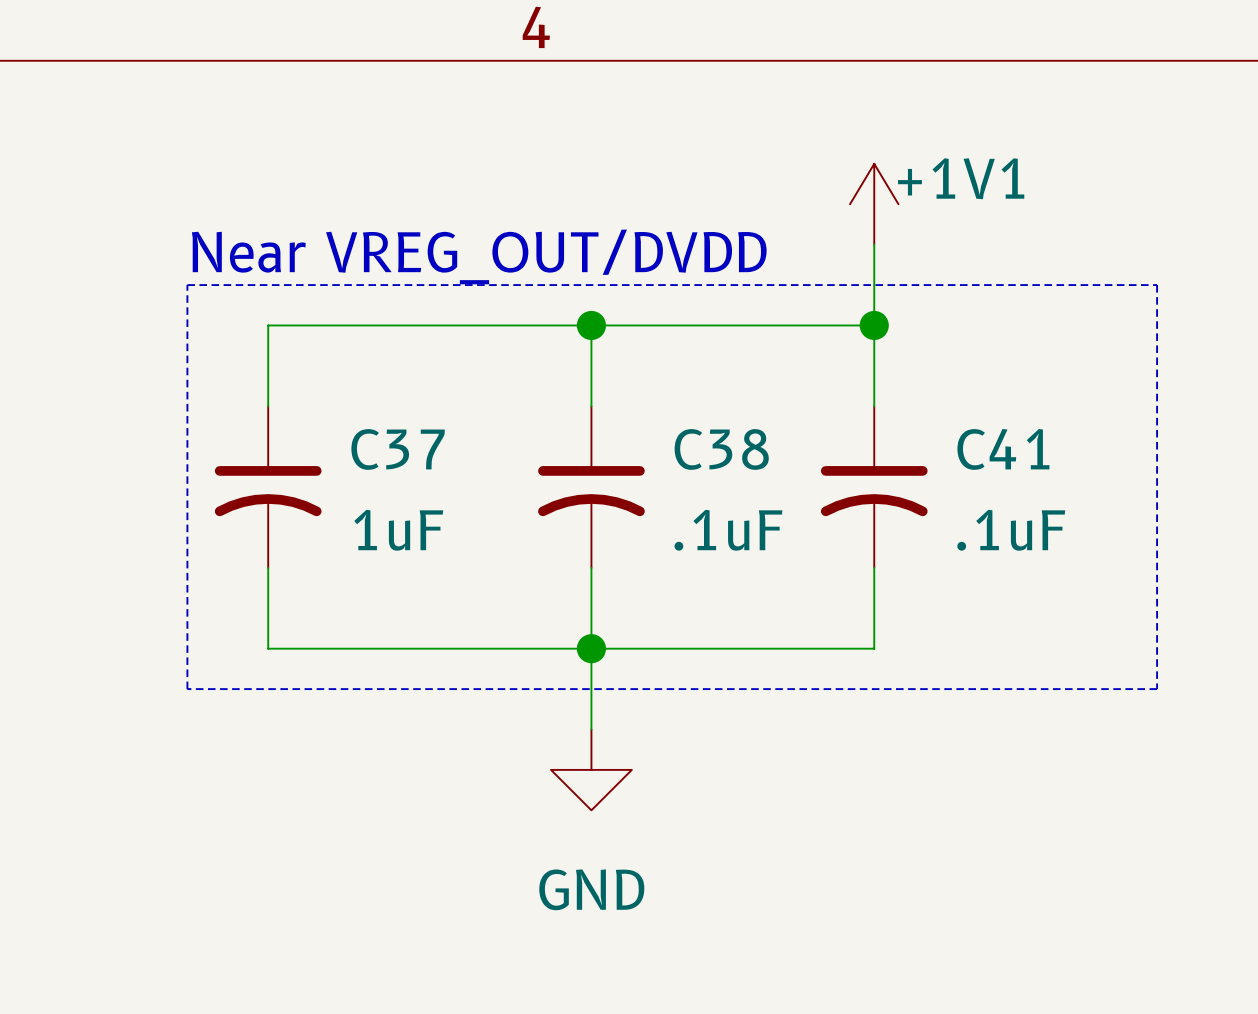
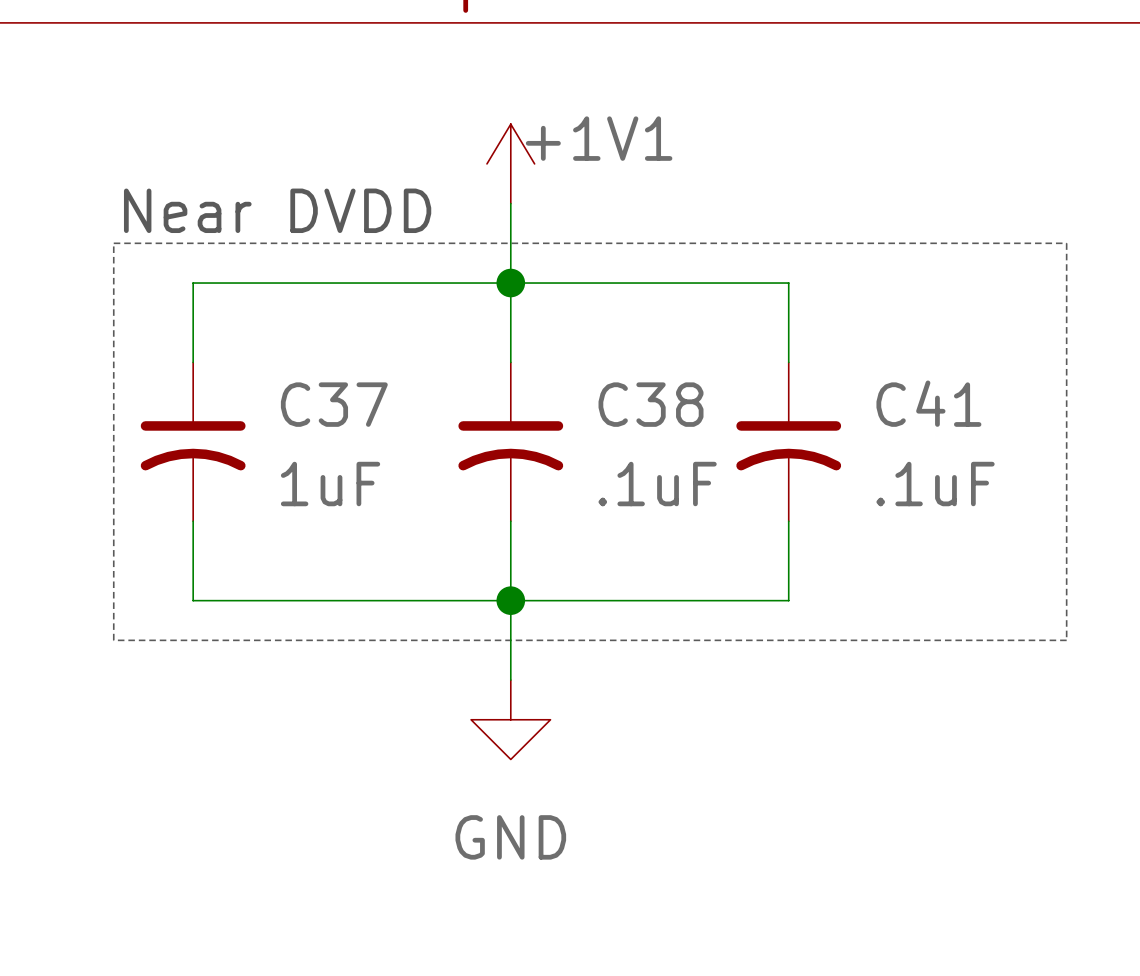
power symbol position: +1V1 (874, 204) -> +1V1 (510, 163)
wire: (874, 244) (874, 325) -> (510, 203) (510, 283)
text: Near VREG_OUT/DVDD (479, 256) -> Near DVDD (277, 210)
junction: (874, 325) -> none

